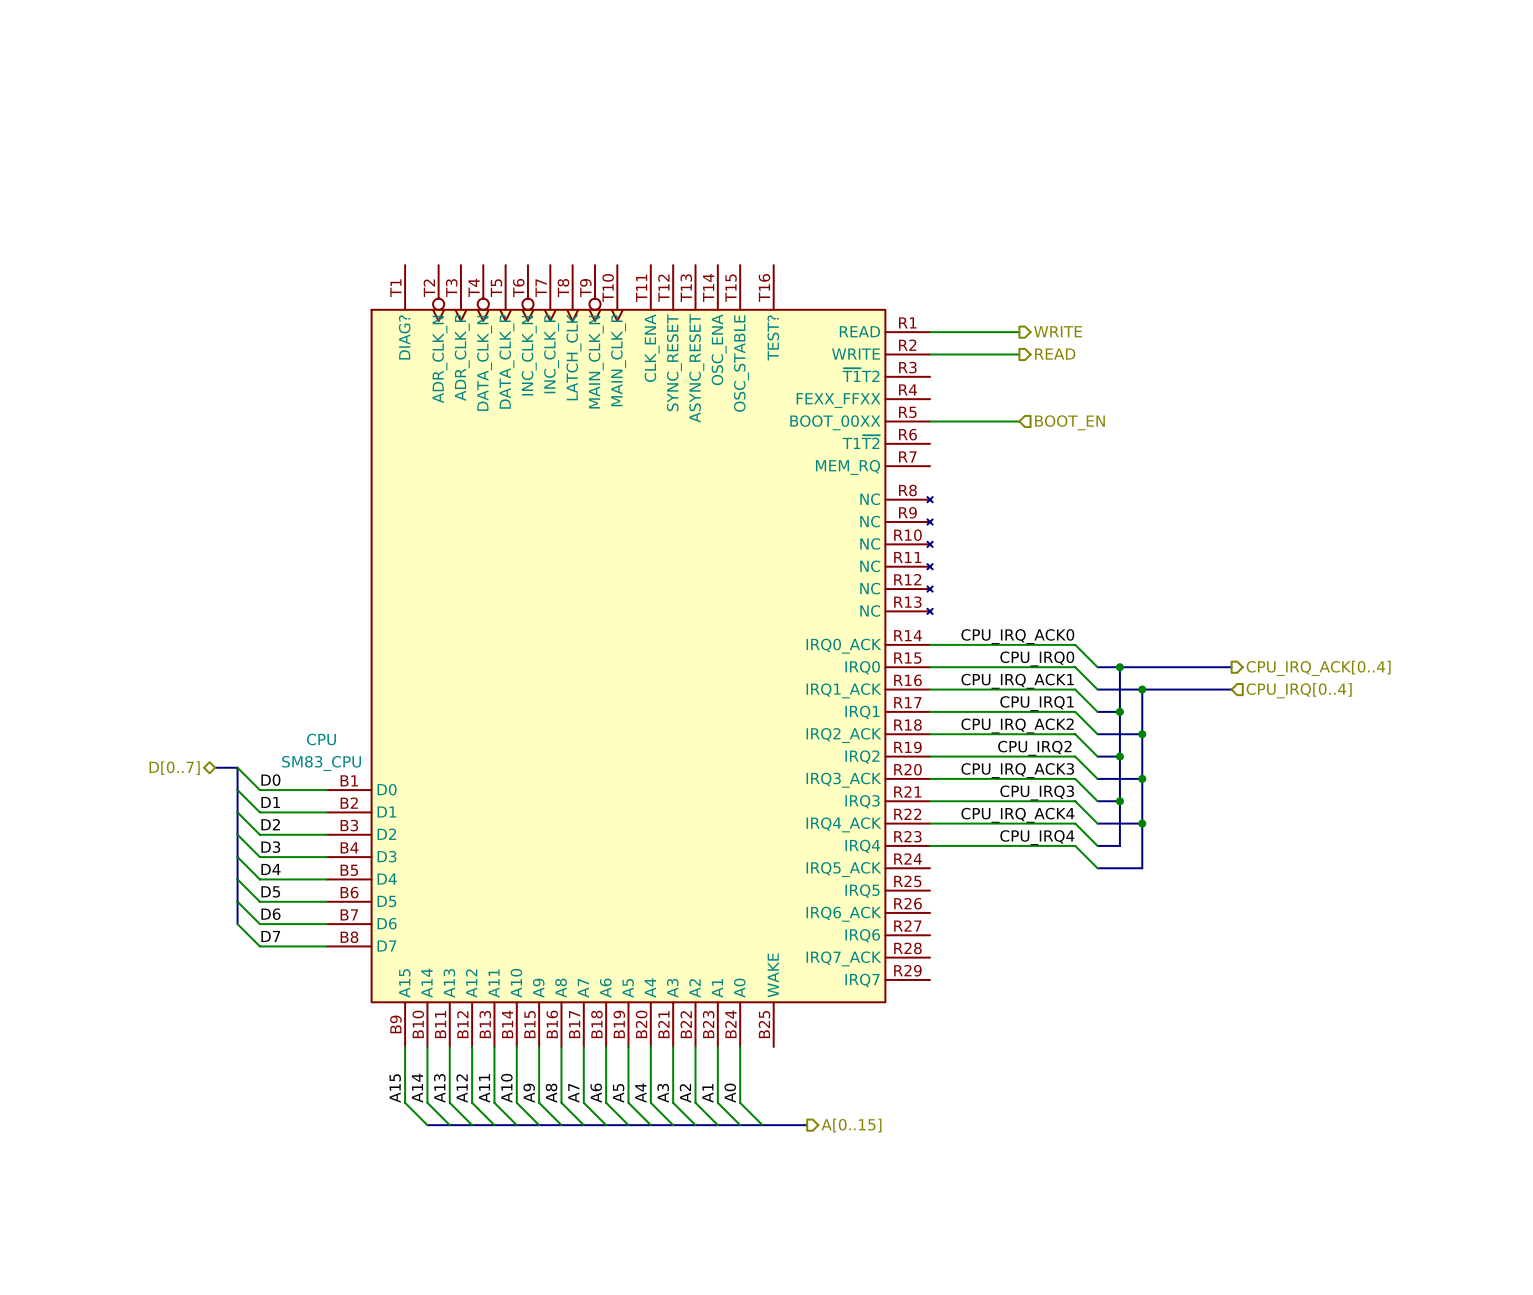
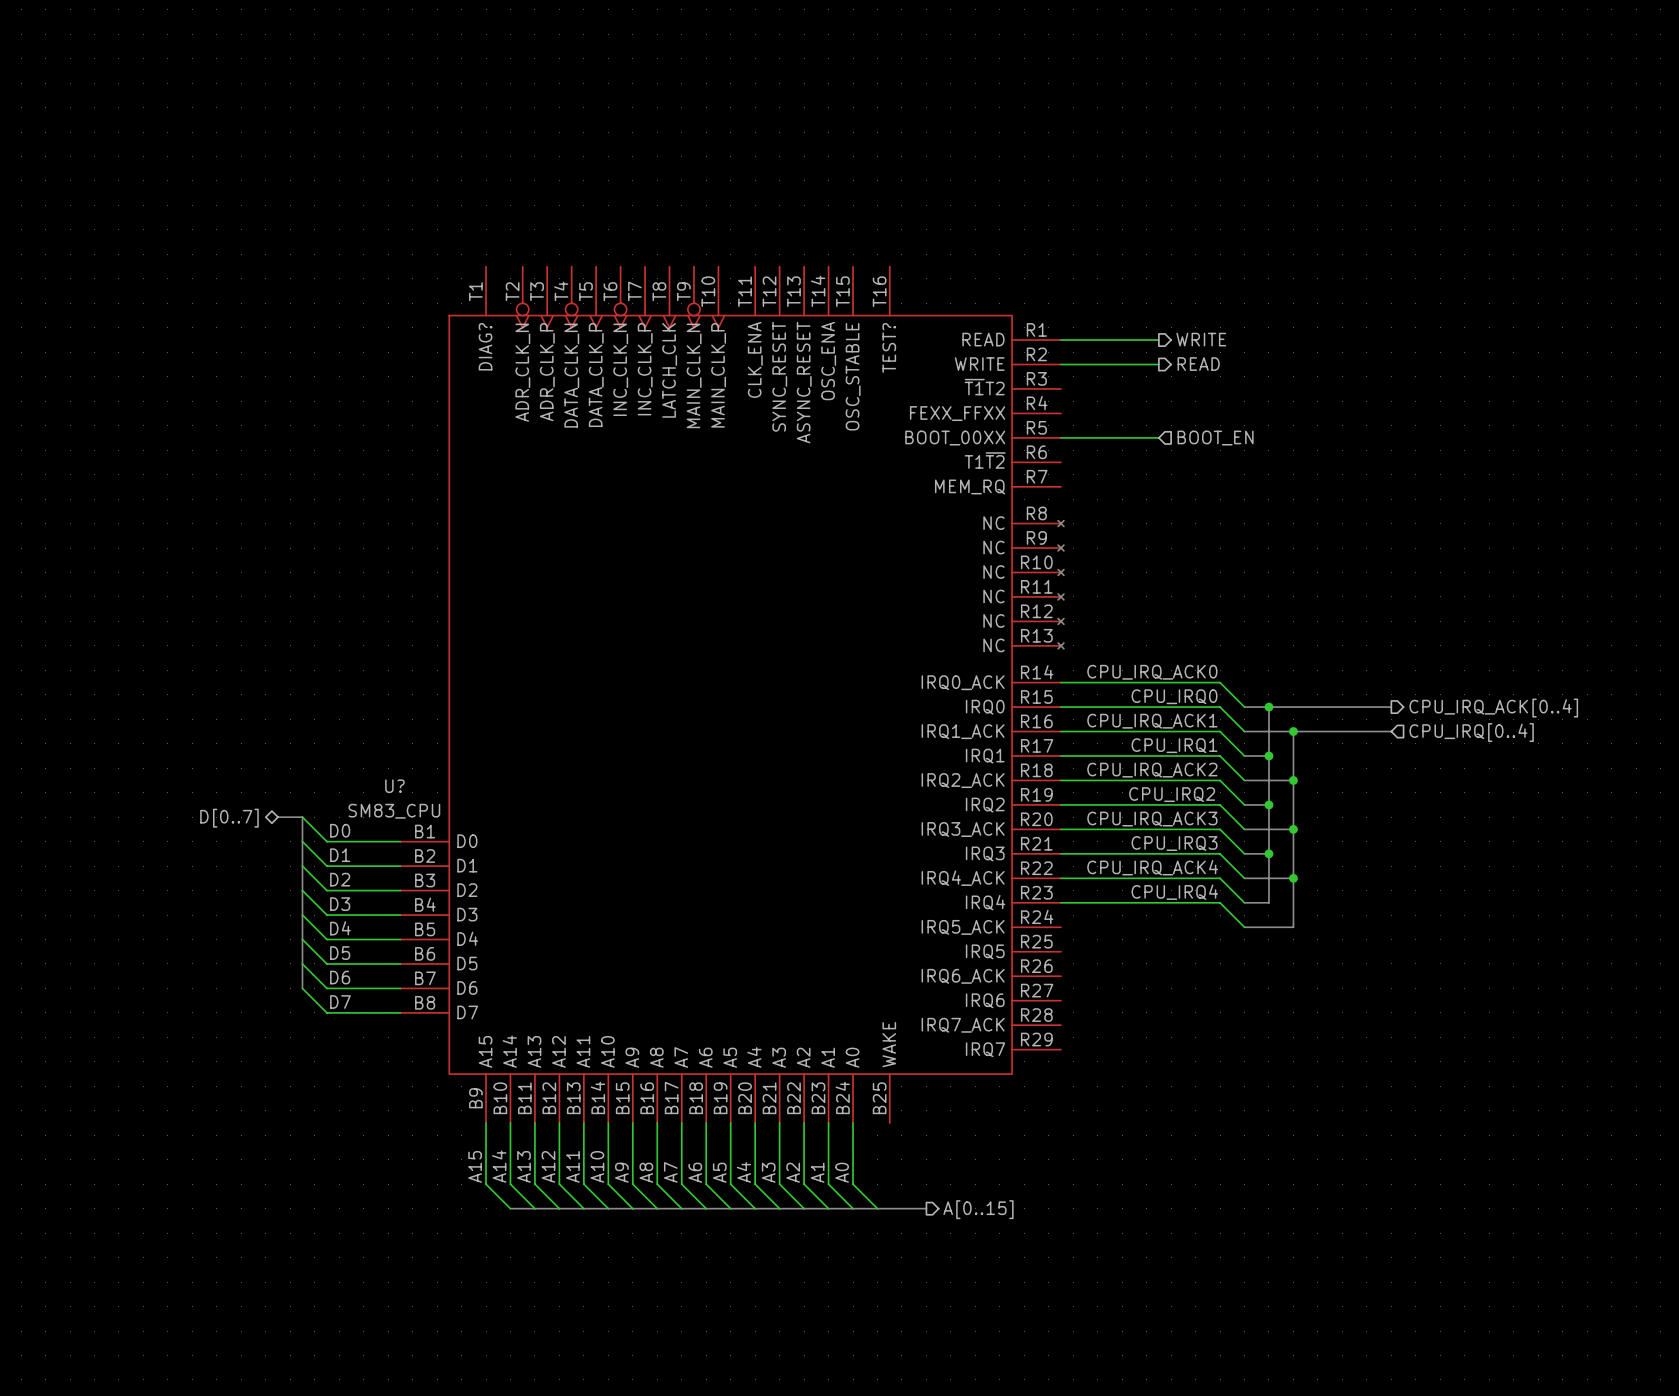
CPU name: CPU (321, 739) -> U? (394, 786)

